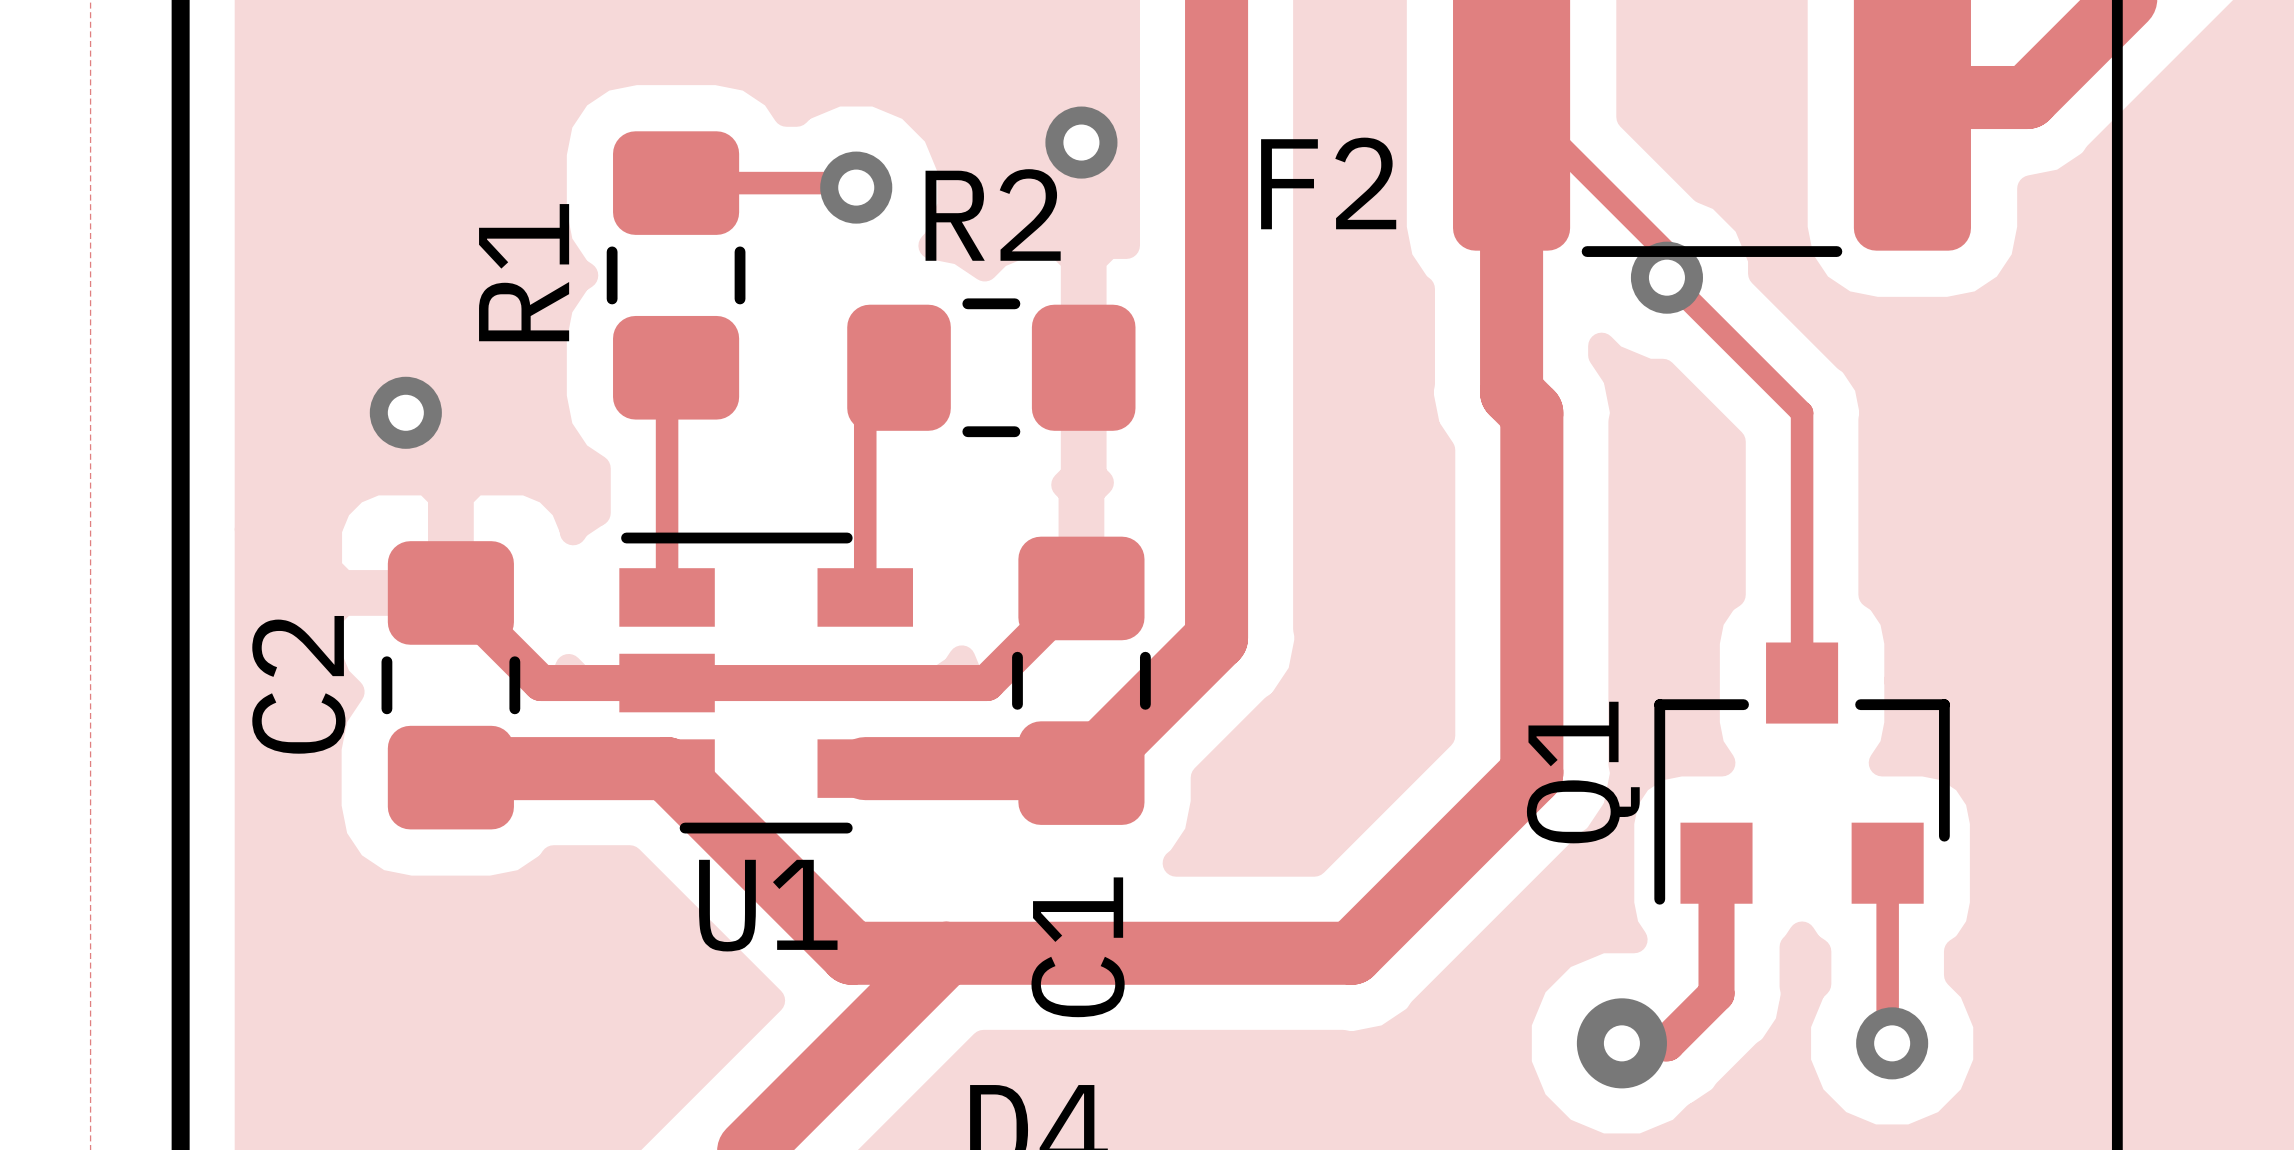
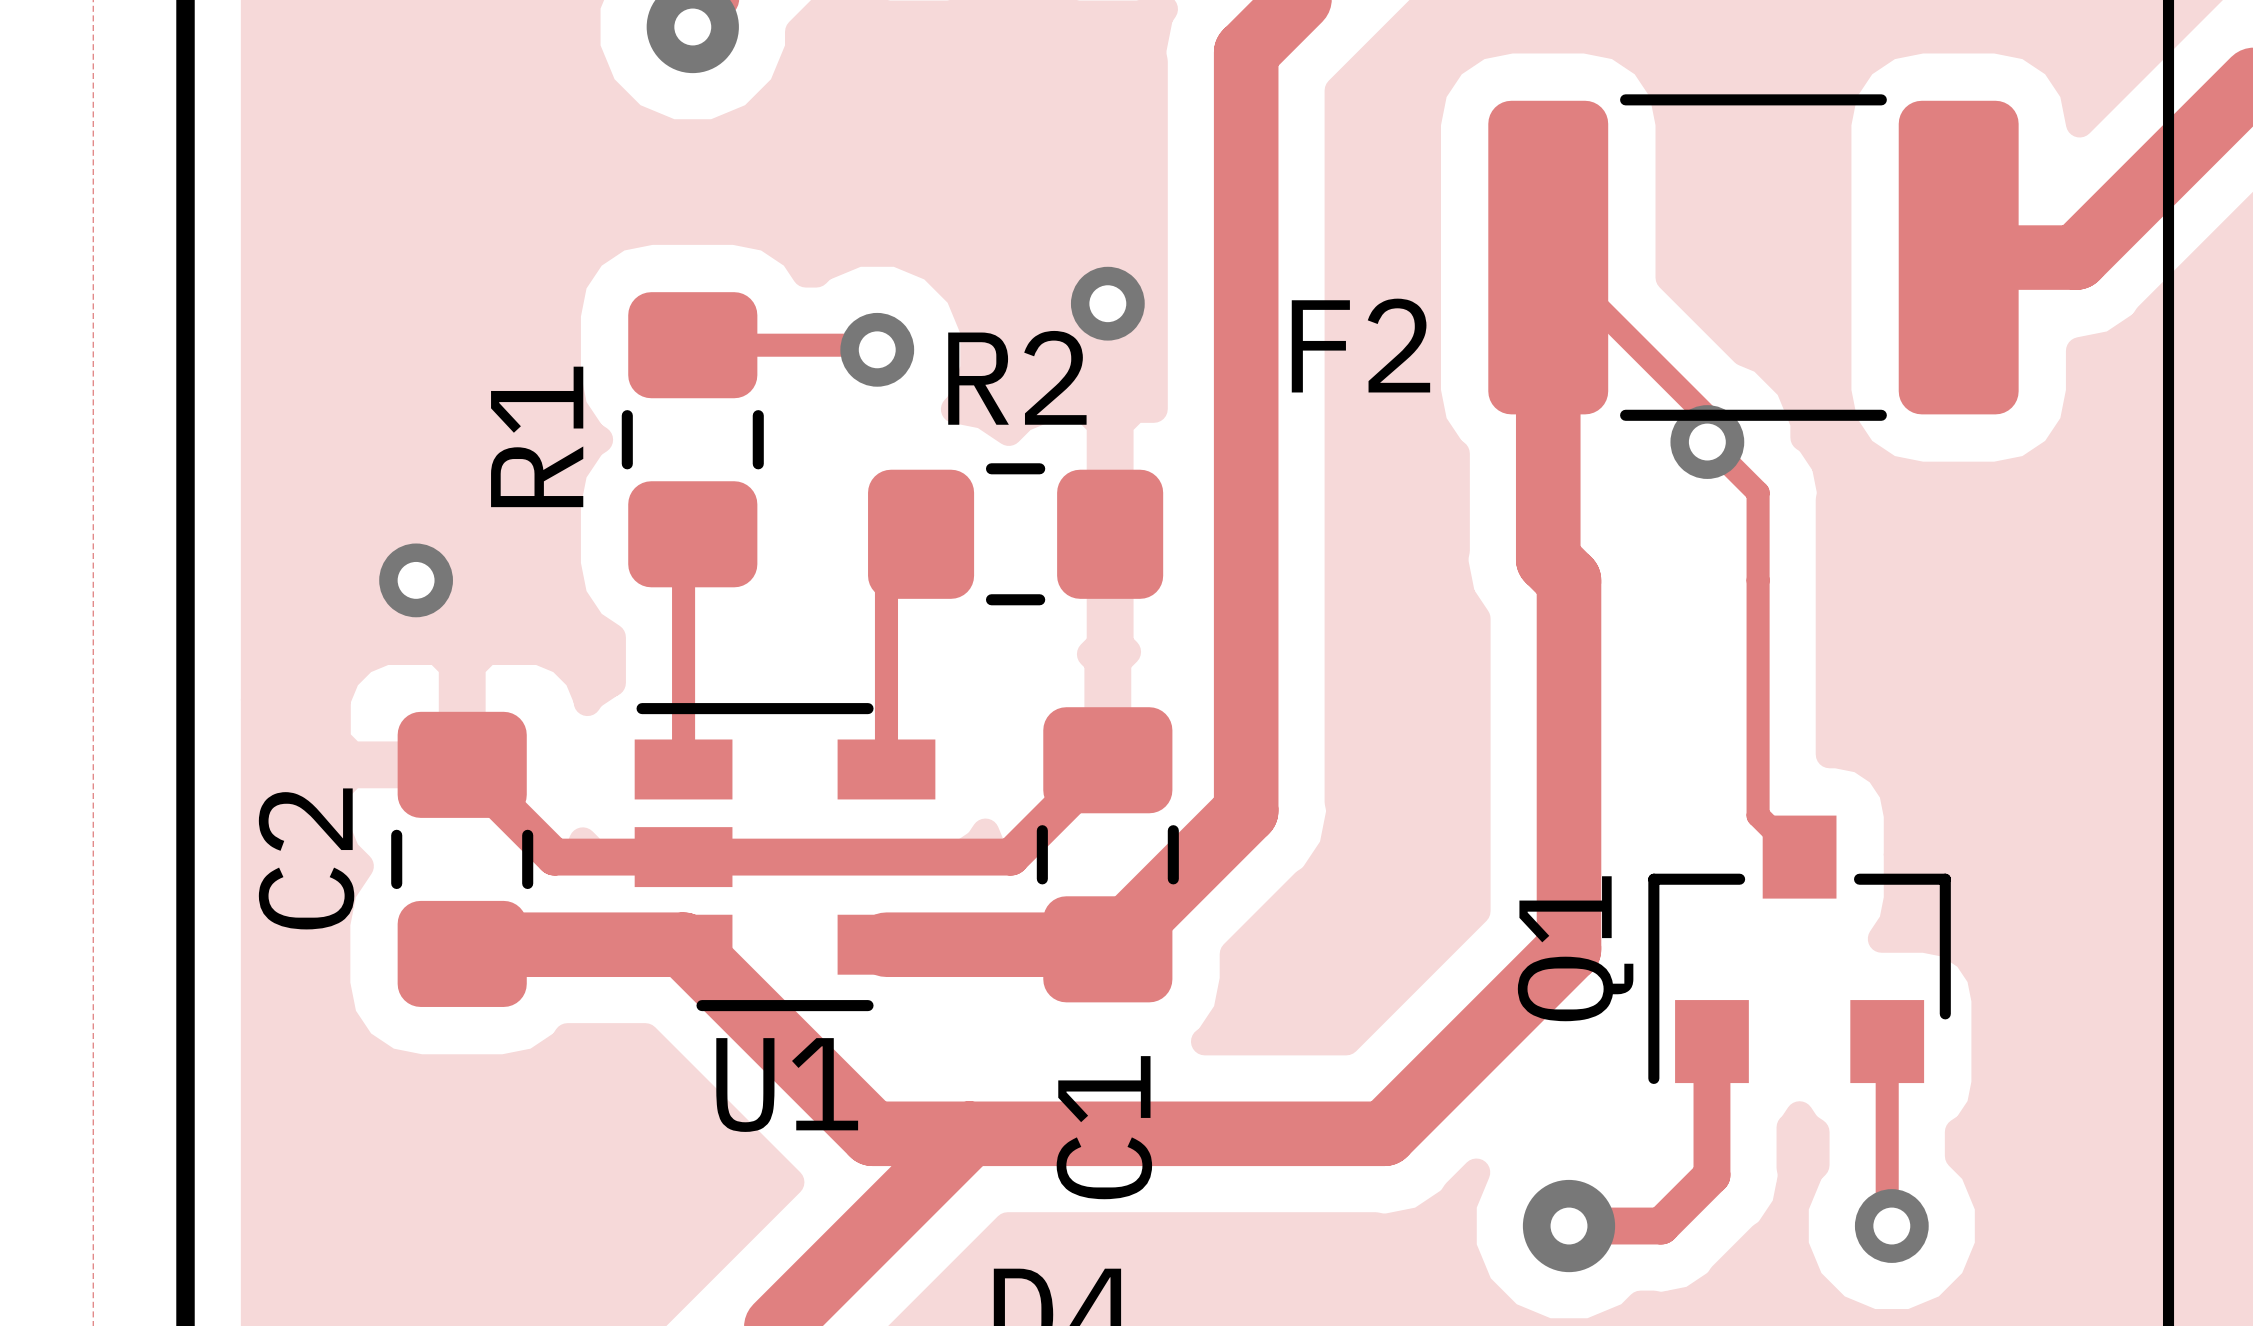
track: (1716, 327) (1802, 412) (1802, 683) -> (1758, 492) (1758, 815) (1799, 857)
Q1 position: (1802, 773) -> (1799, 949)
track: none -> (1711, 1041) (1711, 1175) (1661, 1226) (1569, 1226)
track: (1716, 863) (1716, 993) (1666, 1043) (1621, 1043) -> none
track: (1887, 863) (1887, 1038) (1892, 1043) -> (1887, 1041) (1887, 1221) (1891, 1226)
via position: (1621, 1043) -> (1569, 1226)
via position: (1892, 1043) -> (1891, 1226)

